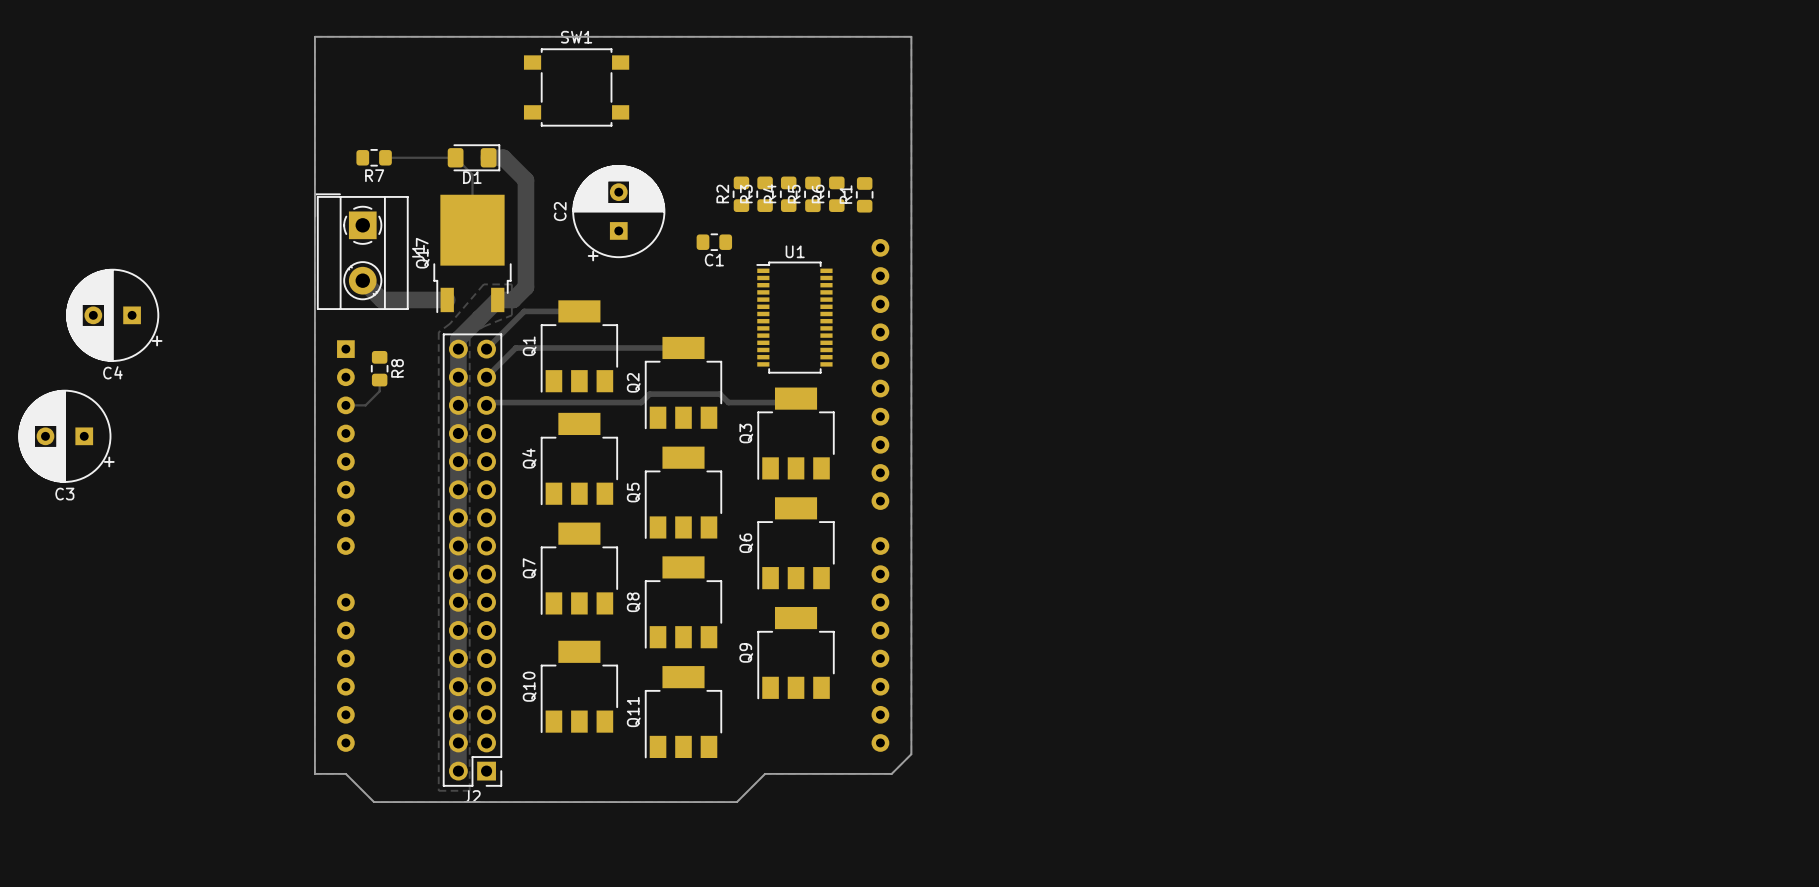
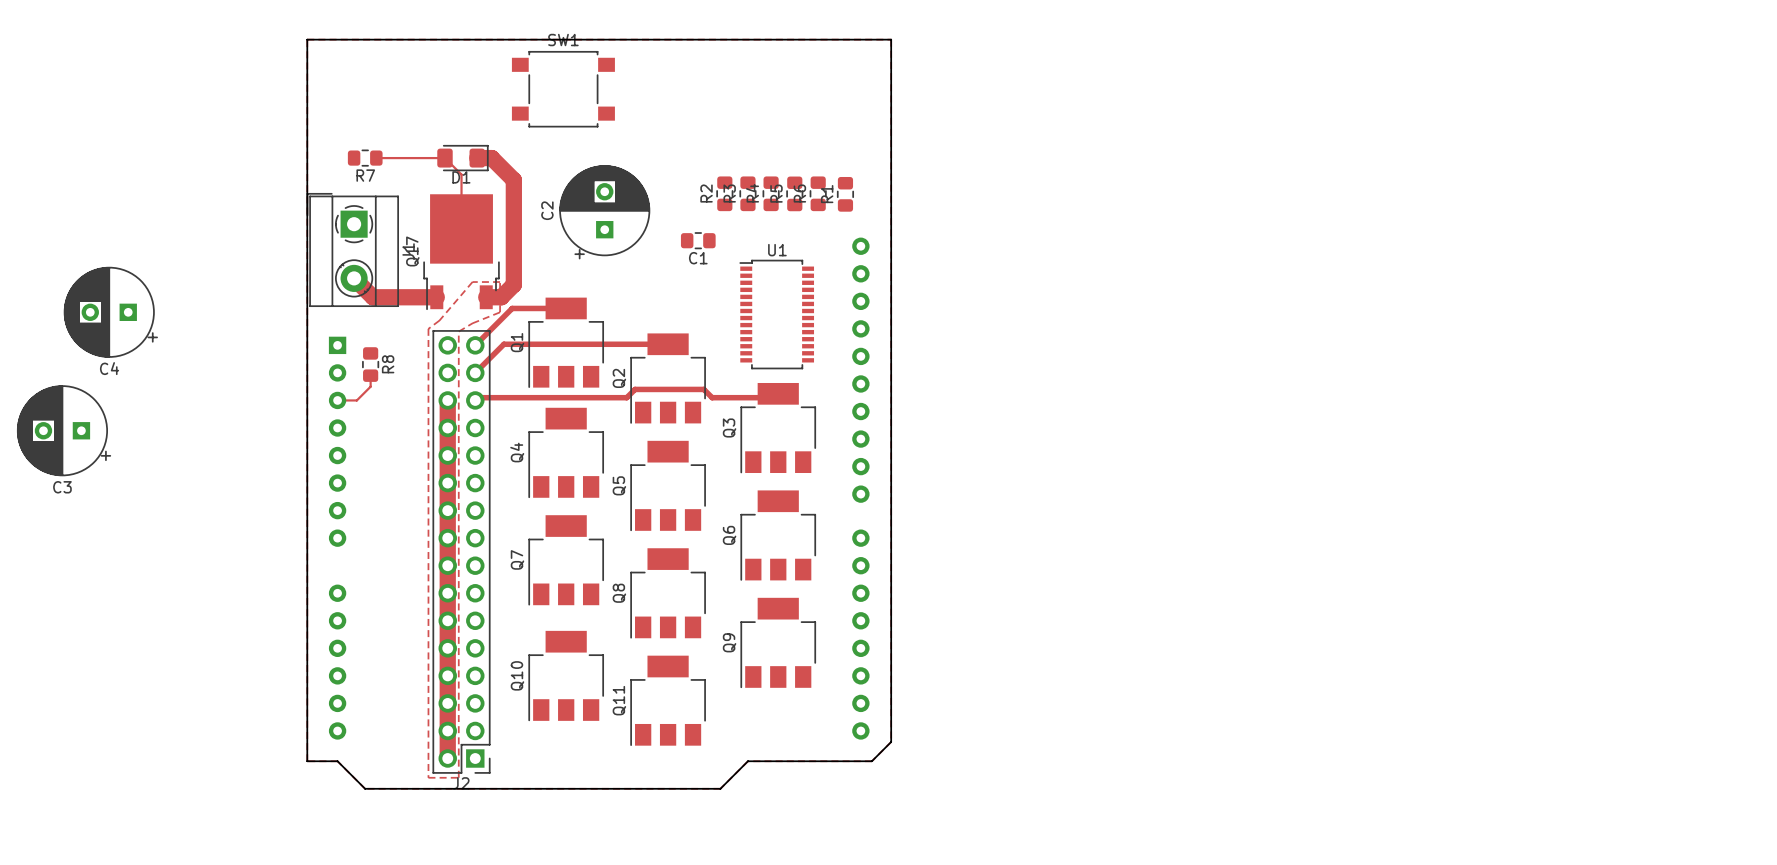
track: (497, 299) (458, 339) (458, 405) -> none

